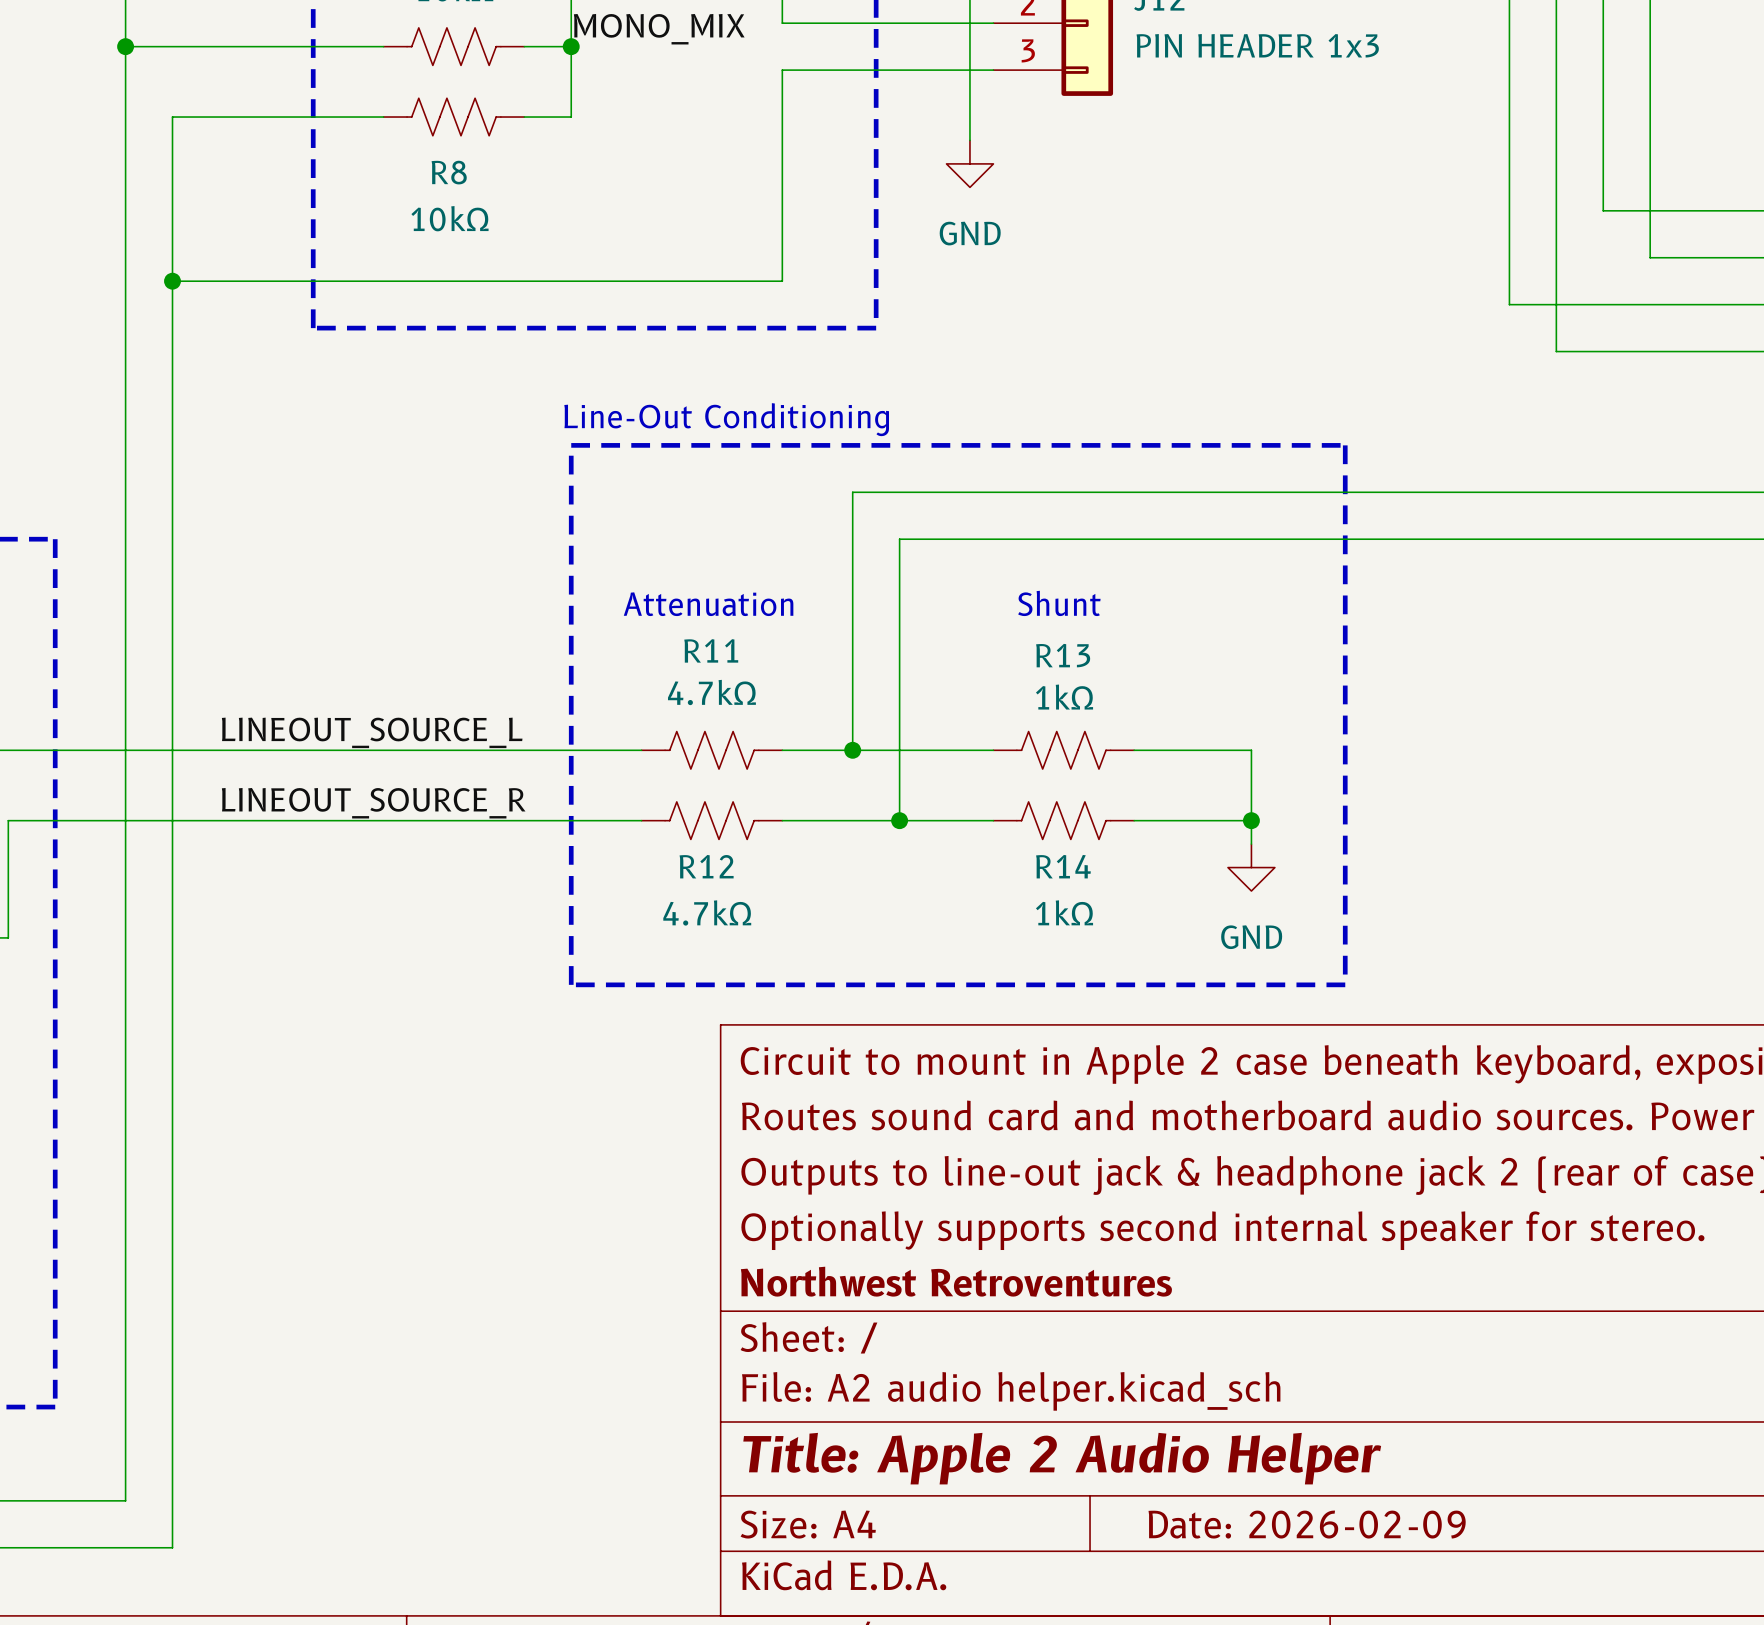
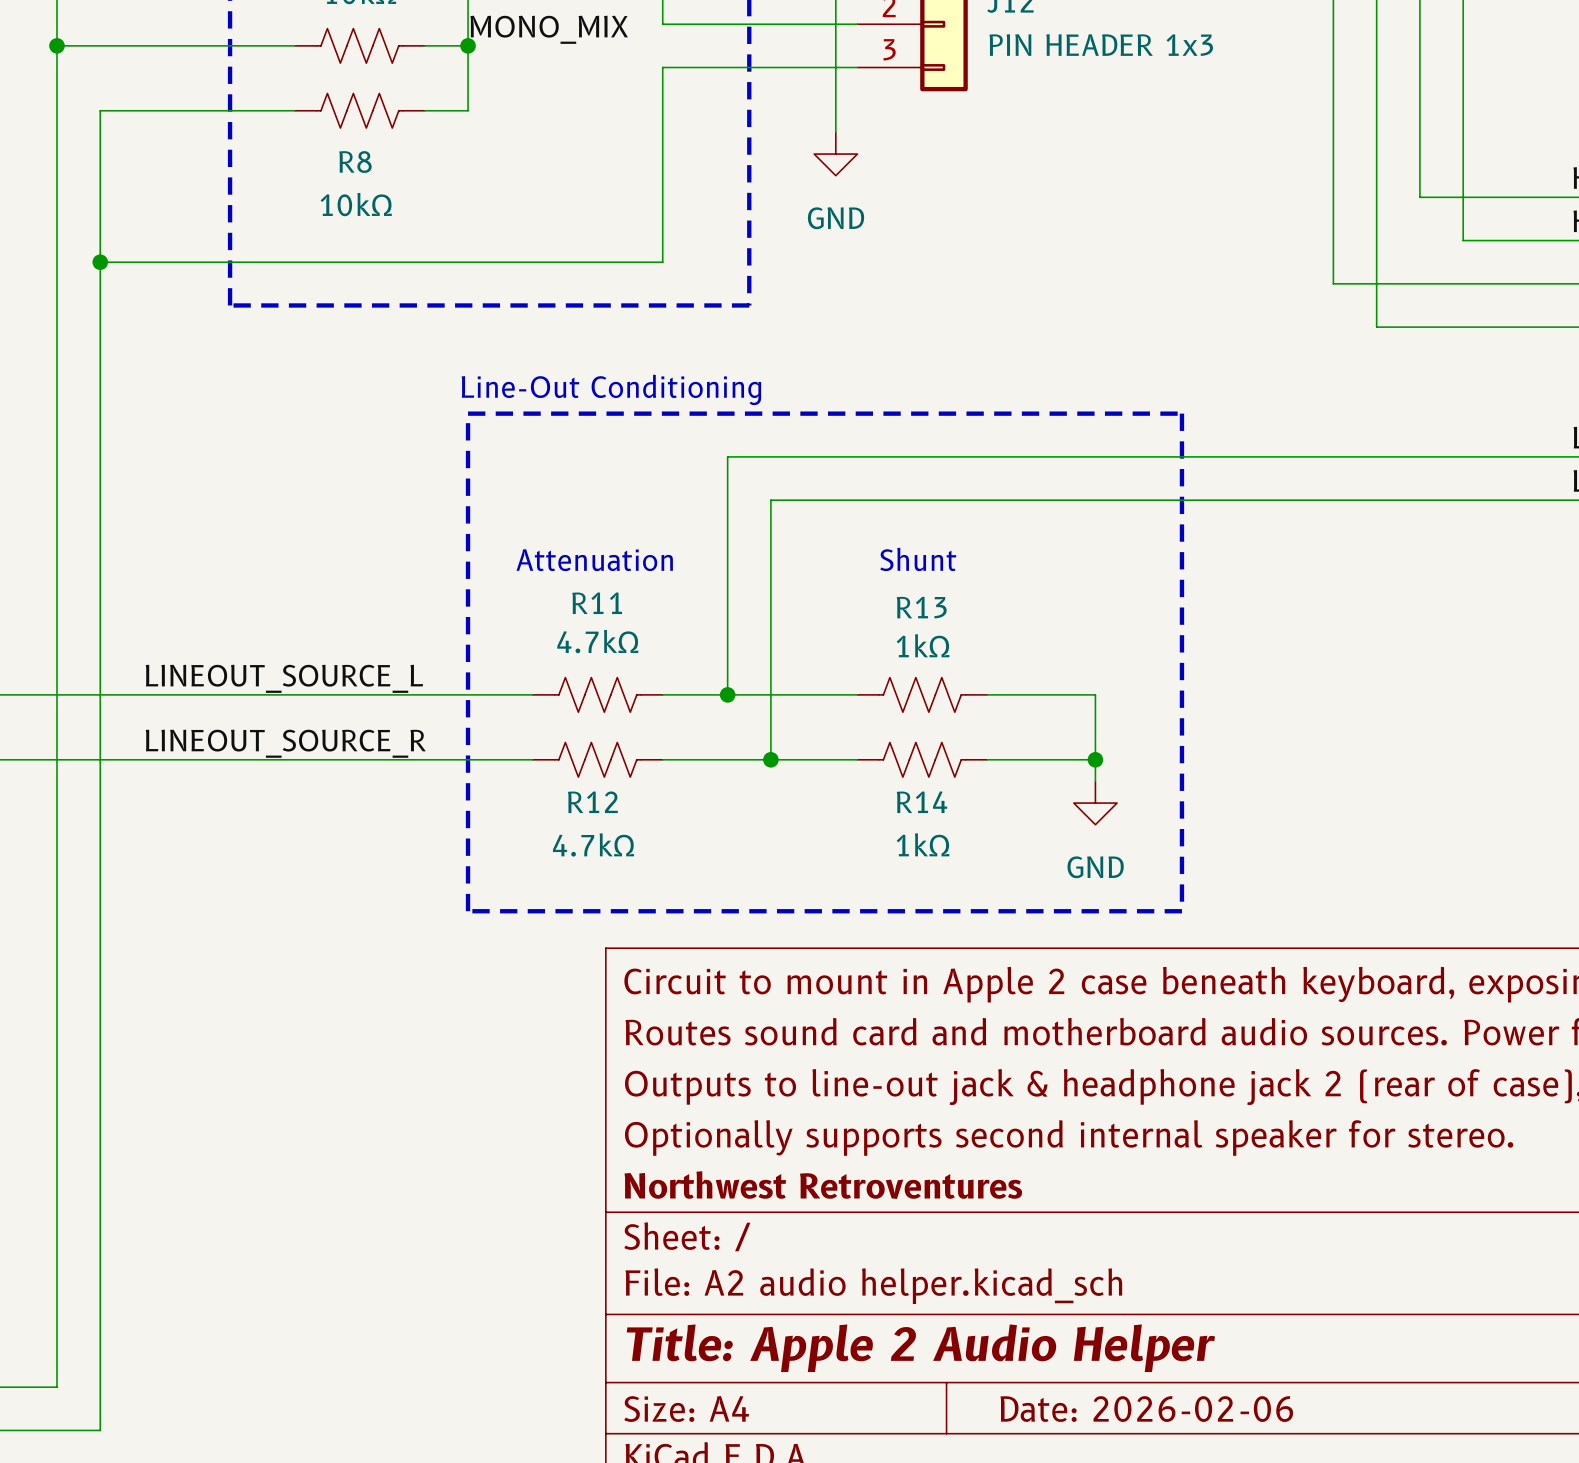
title block: Date: 2026-02-09 (1307, 1524) -> Date: 2026-02-06 (1146, 1409)

